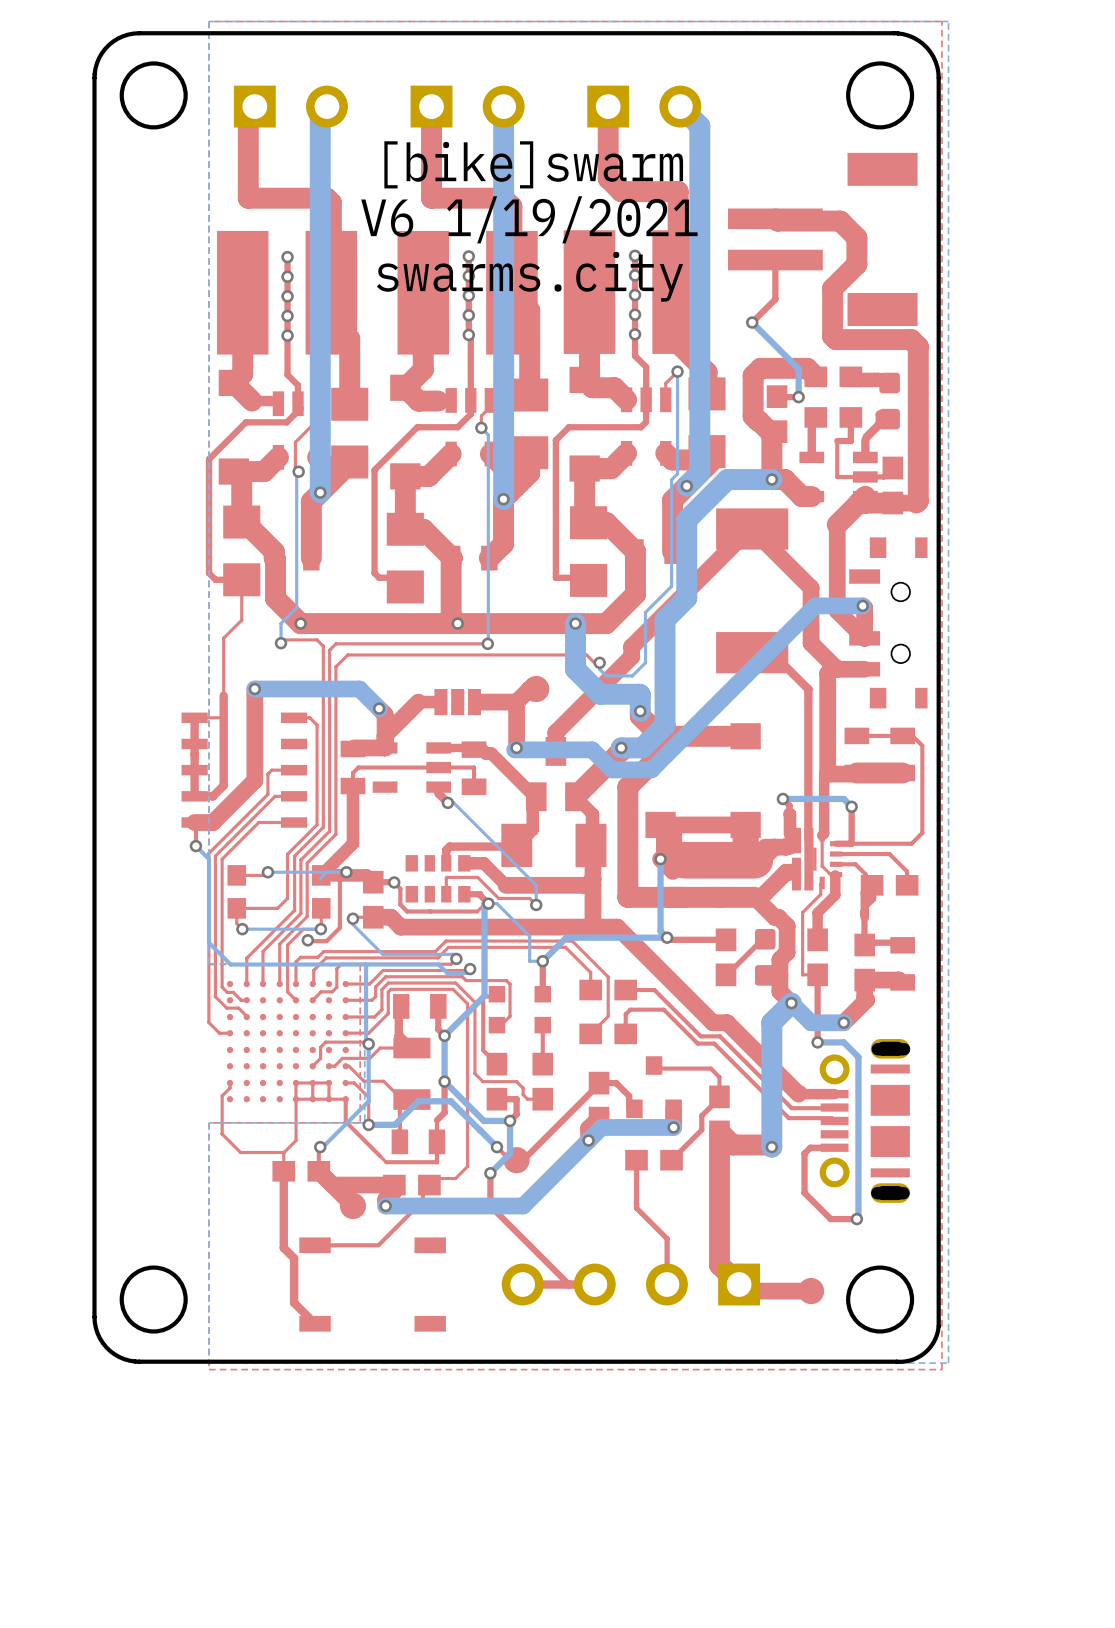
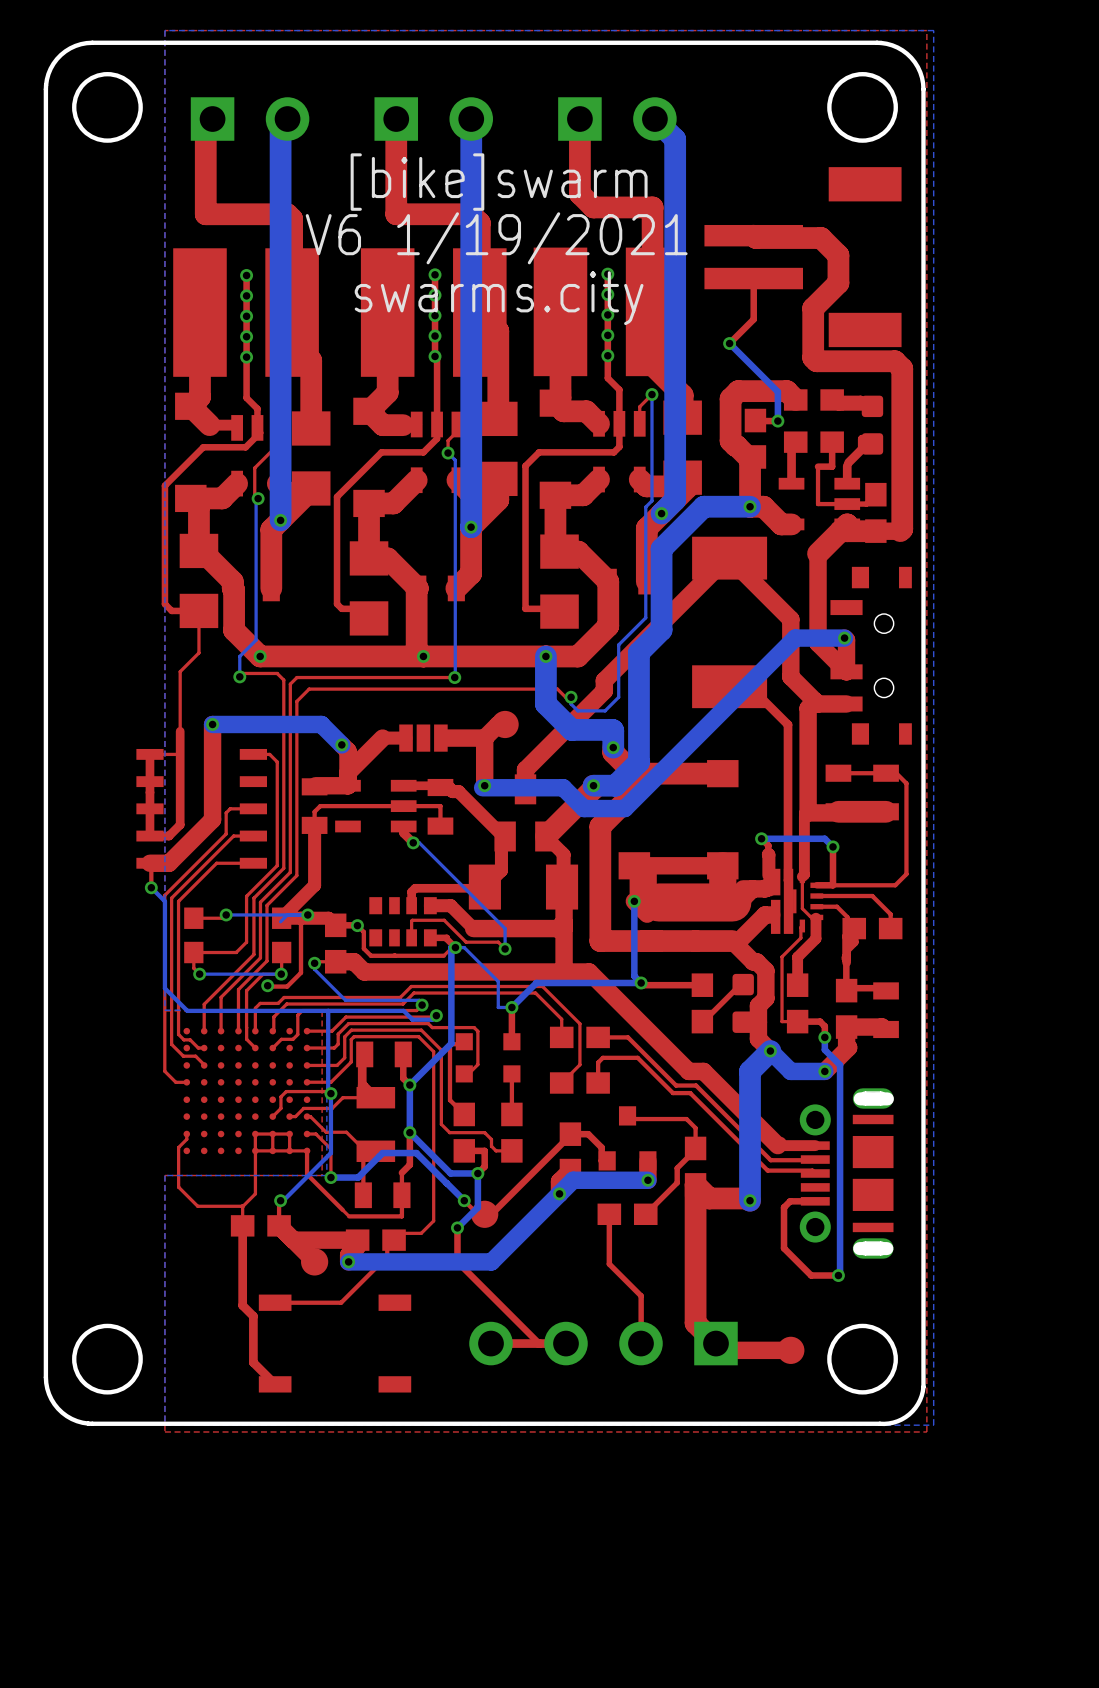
top track: (817, 974) (817, 1042) -> (797, 1021) (820, 1021) (824, 1026) (824, 1037)
bottom track: (817, 1042) (843, 1042) (858, 1057) -> (824, 1037) (824, 1049) (840, 1065) (840, 1107)
via position: (817, 1042) -> (824, 1037)

